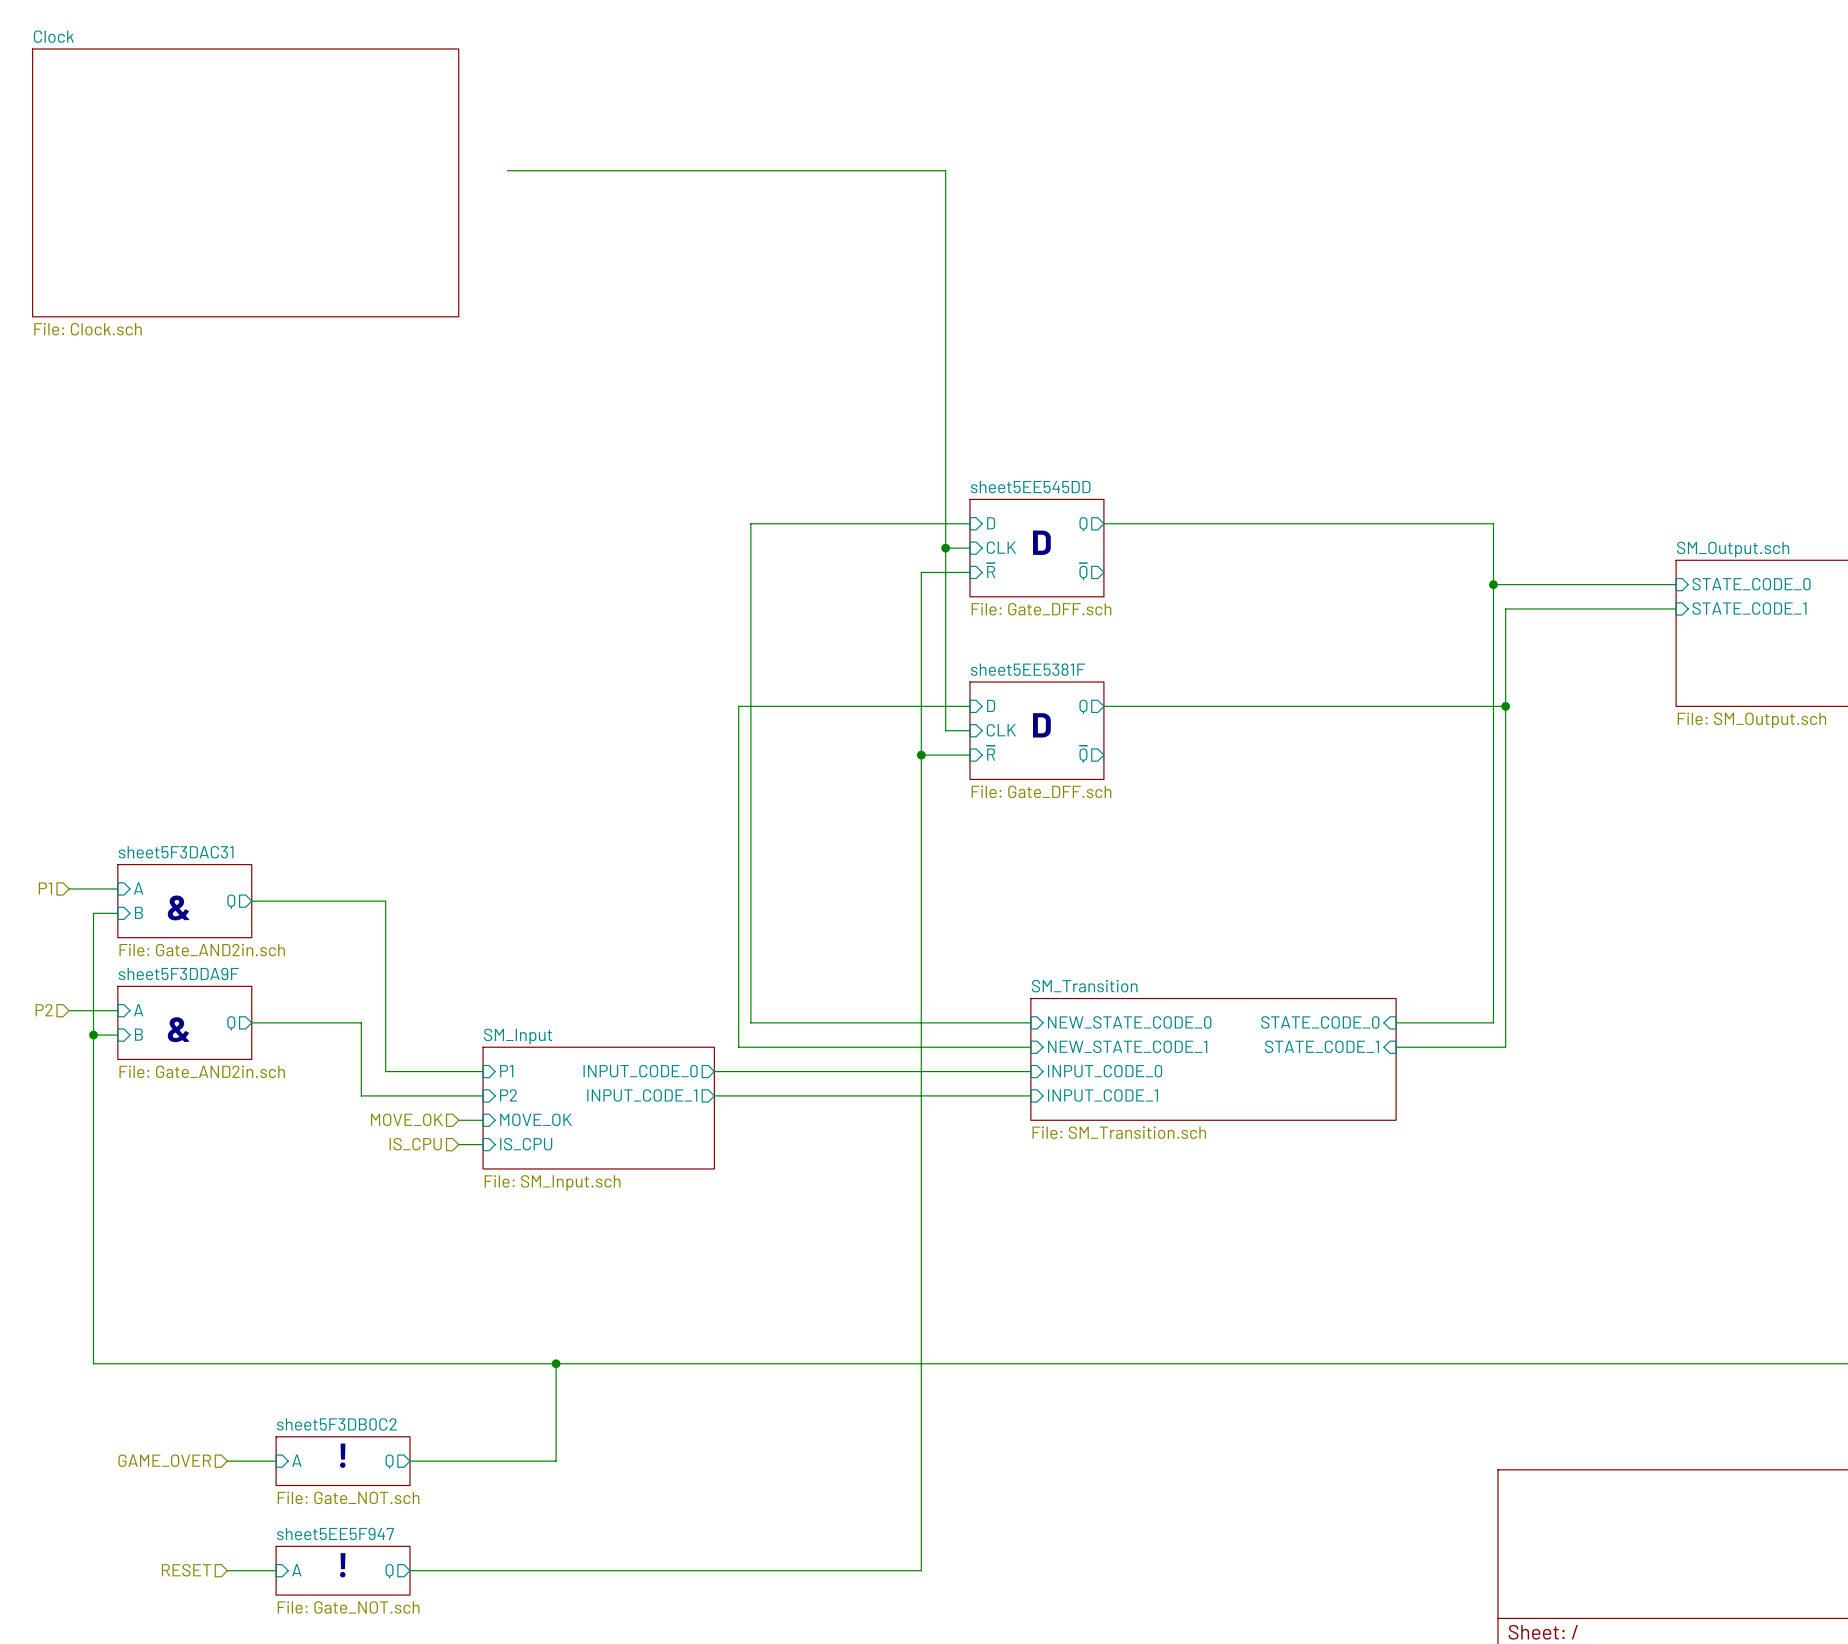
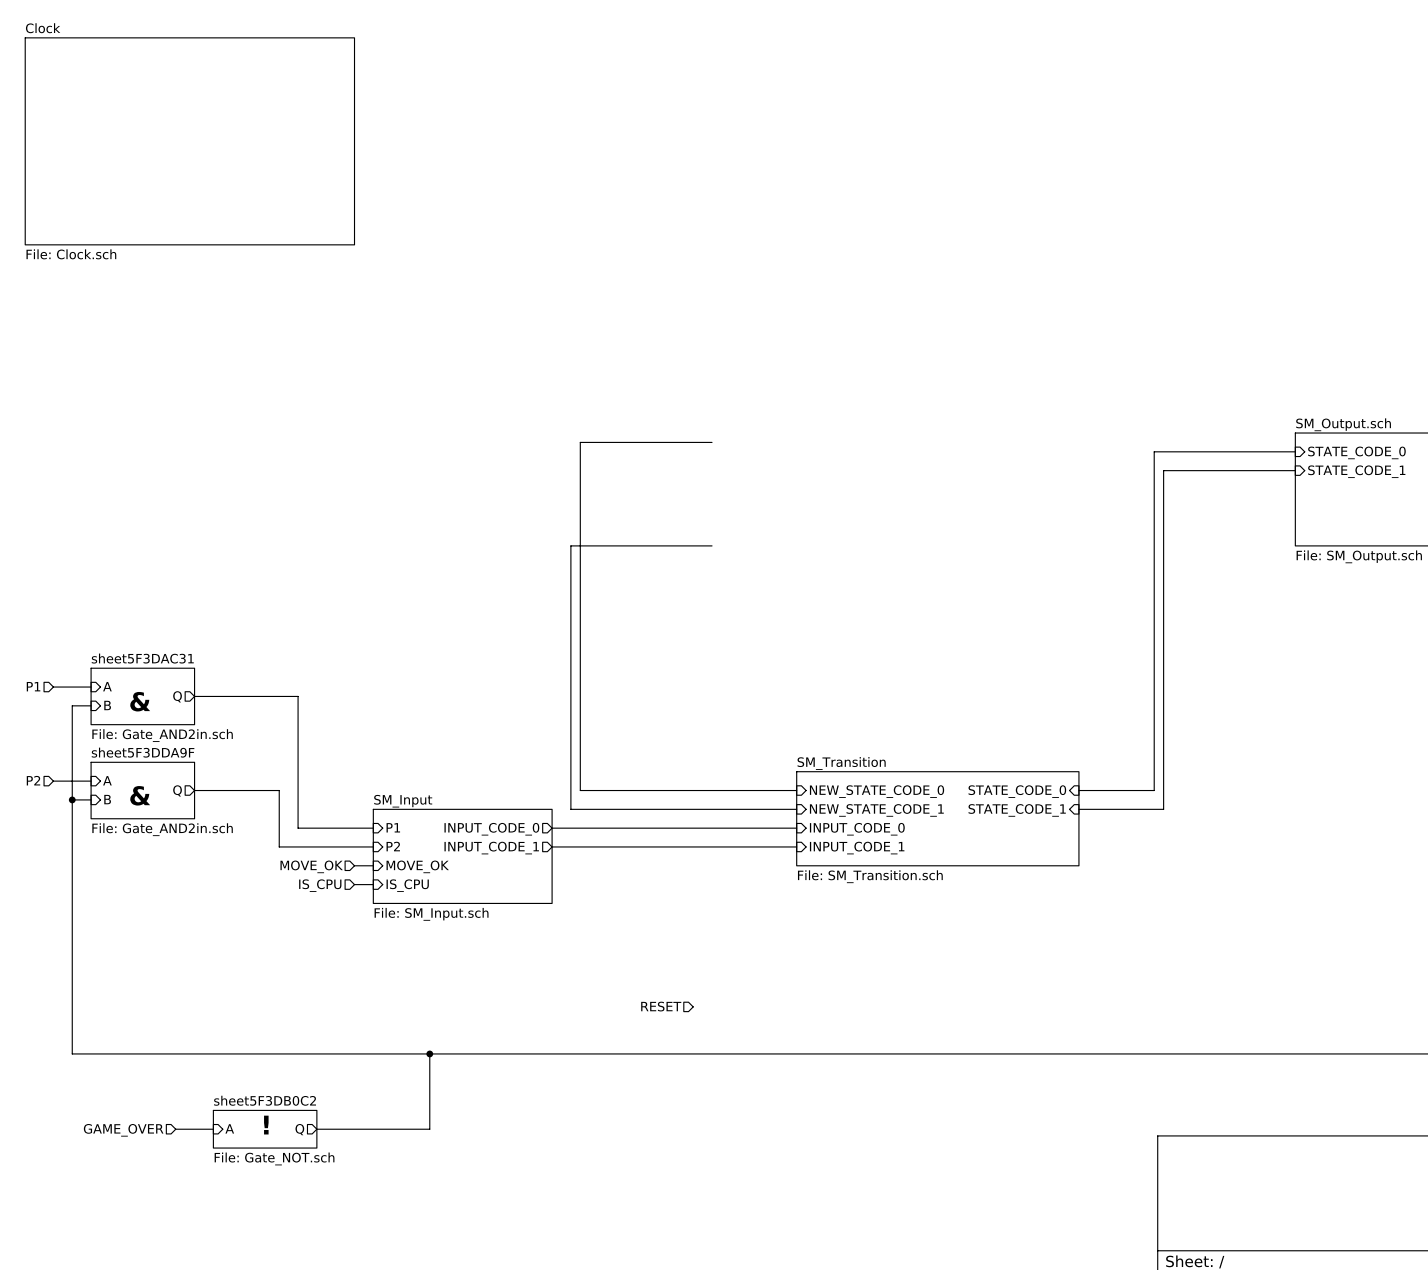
wire: (507, 170) (945, 170) (945, 730) (970, 730) -> none
wire: (970, 523) (750, 523) (750, 572) -> (712, 442) (580, 442)
sheet pin: D (991, 523) -> none
wire: (1103, 523) (1493, 523) (1493, 584) -> none
sheet pin: Q (1083, 524) -> none
text: D (1041, 542) -> none
sheet pin: CLK (1001, 547) -> none
wire: (945, 548) (970, 548) -> none
junction: (945, 548) -> none
sheet sheet5EE545DD: File: Gate_DFF.sch (1036, 548) -> none
sheet pin: ~{R} (990, 570) -> none
sheet pin: ~{Q} (1083, 571) -> none
wire: (970, 572) (921, 572) (921, 1570) (410, 1570) -> none
junction: (1493, 584) -> none
sheet pin: D (991, 705) -> none
wire: (921, 706) (970, 706) -> none
sheet pin: Q (1083, 706) -> none
wire: (1103, 706) (1505, 706) -> none
junction: (1505, 706) -> none
text: D (1041, 725) -> none
sheet pin: CLK (1001, 730) -> none
sheet sheet5EE5381F: File: Gate_DFF.sch (1036, 730) -> none
sheet pin: ~{R} (990, 753) -> none
sheet pin: ~{Q} (1083, 754) -> none
wire: (921, 755) (970, 755) -> none
junction: (921, 755) -> none
hierarchical label: none -> RESET (661, 1006)
text: ! (342, 1565) -> none
hierarchical label: RESET (186, 1570) -> none
wire: (227, 1570) (276, 1570) -> none
sheet pin: A (296, 1570) -> none
sheet sheet5EE5F947: File: Gate_NOT.sch (343, 1570) -> none
sheet pin: Q (389, 1571) -> none

